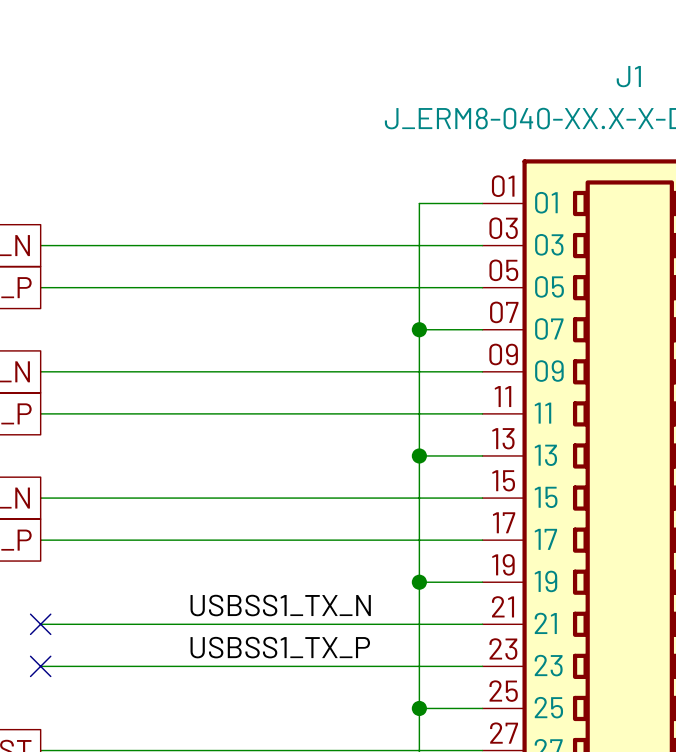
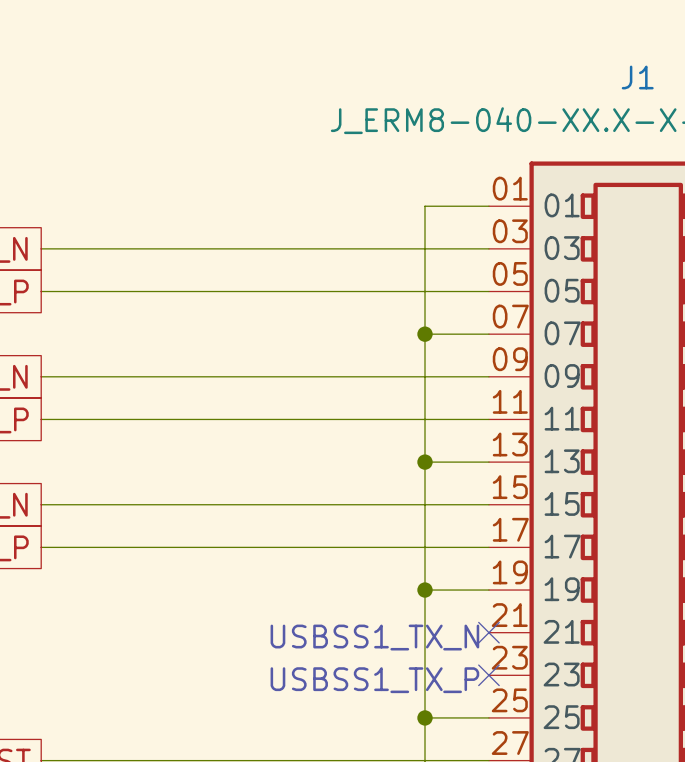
label: USBSS1_TX_N (280, 605) -> none
wire: (40, 624) (482, 624) -> none
no-connect mark: (40, 624) -> none
no-connect mark: none -> (488, 632)
text: none -> USBSS1_TX_N (374, 637)
label: USBSS1_TX_P (280, 647) -> none
wire: (40, 666) (482, 666) -> none
no-connect mark: (40, 666) -> none
no-connect mark: none -> (488, 675)
text: none -> USBSS1_TX_P (374, 680)

